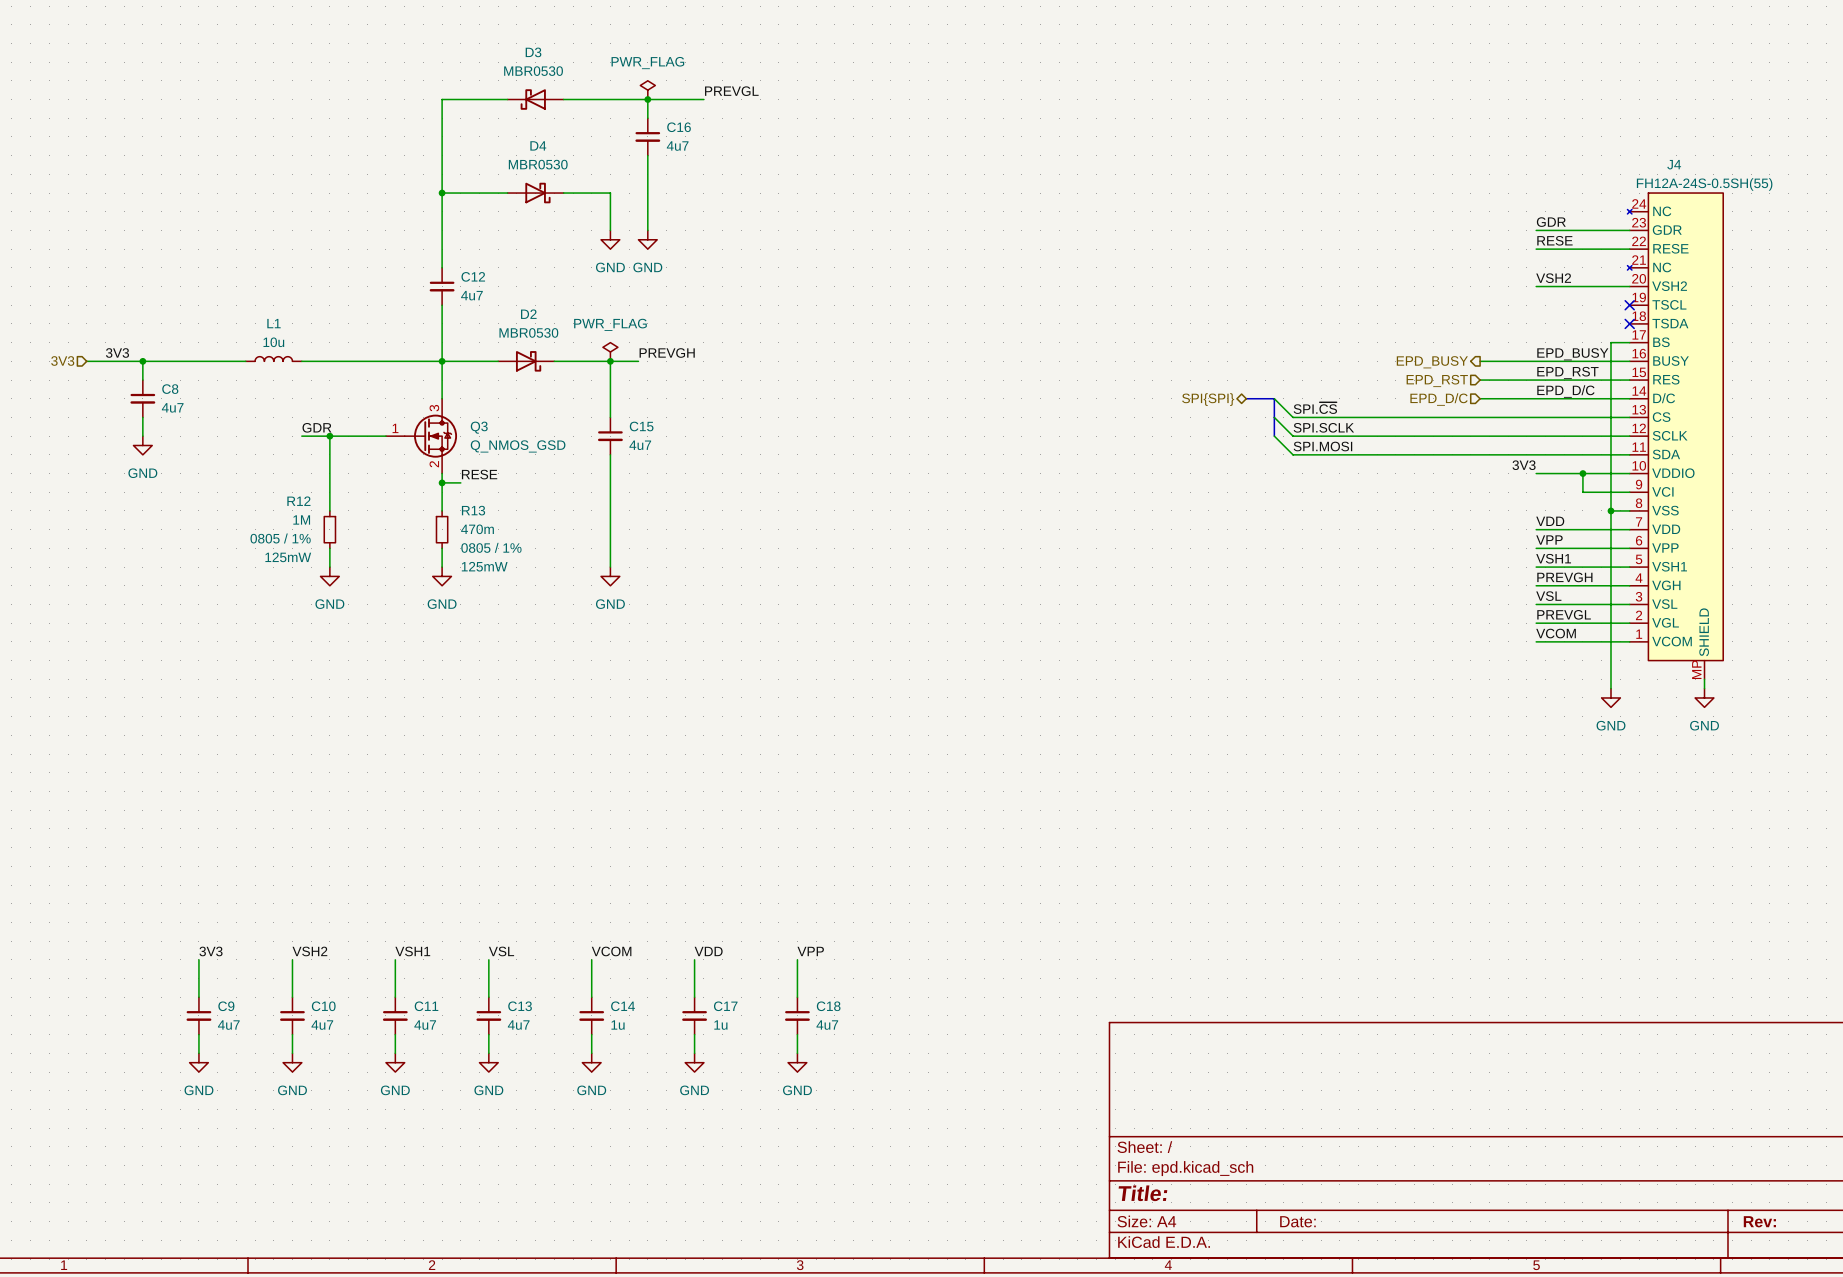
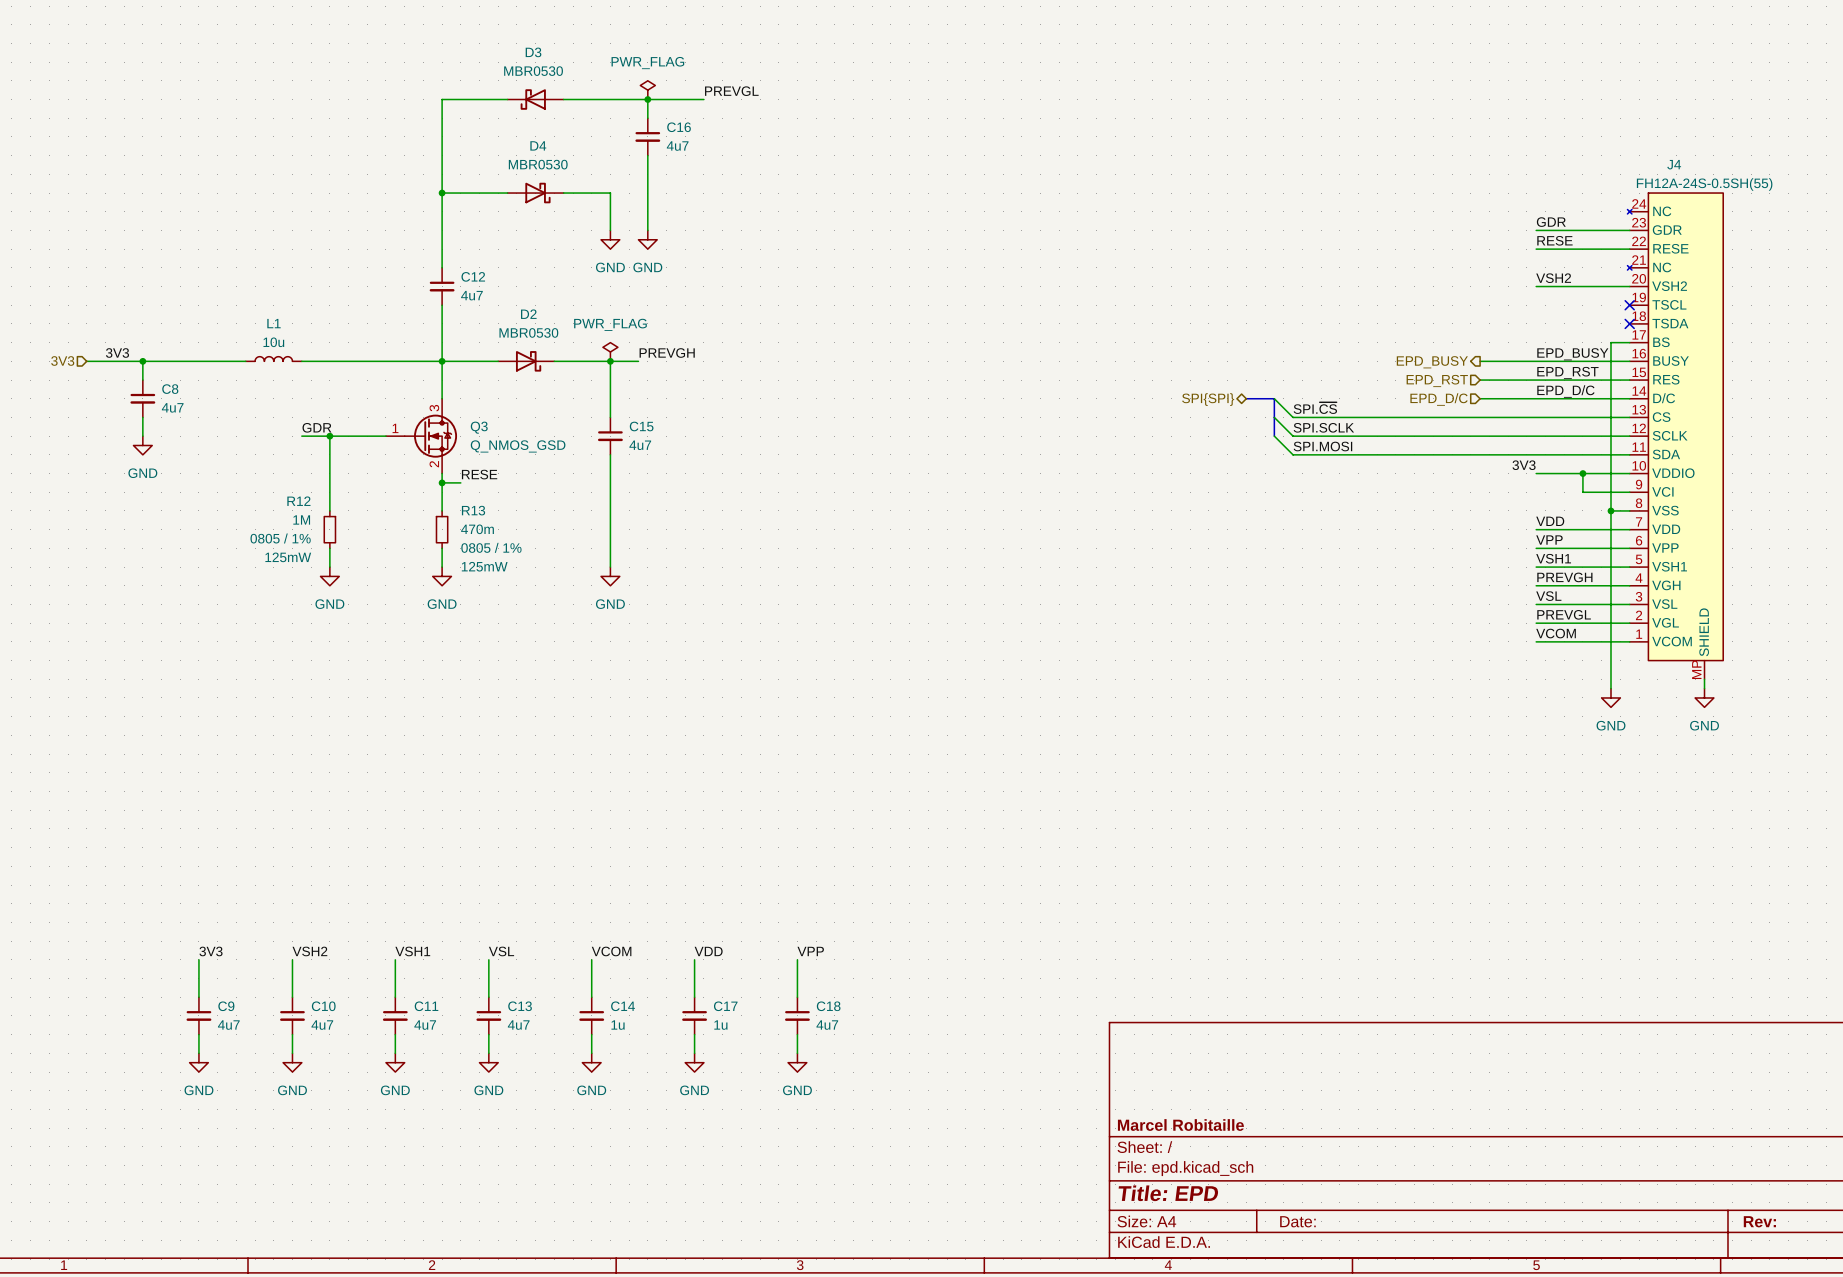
title block: none -> Marcel Robitaille (1180, 1125)
title block: Title: (1142, 1193) -> Title: EPD (1168, 1193)

